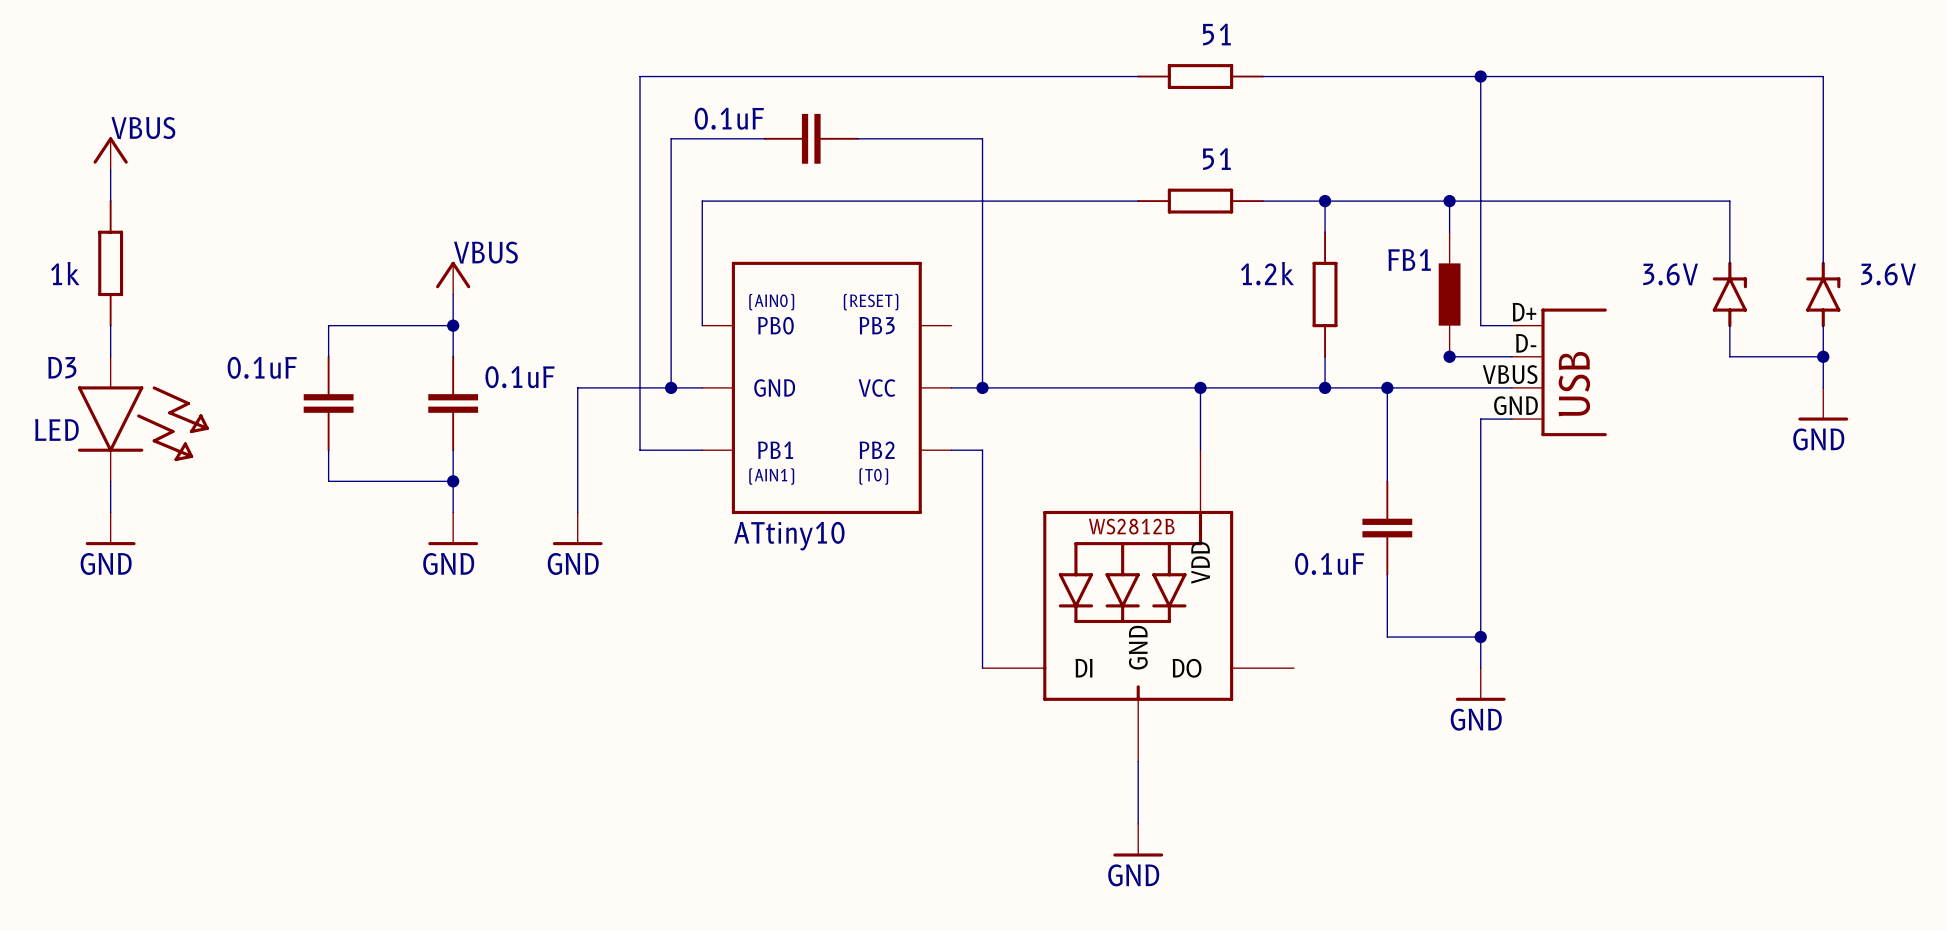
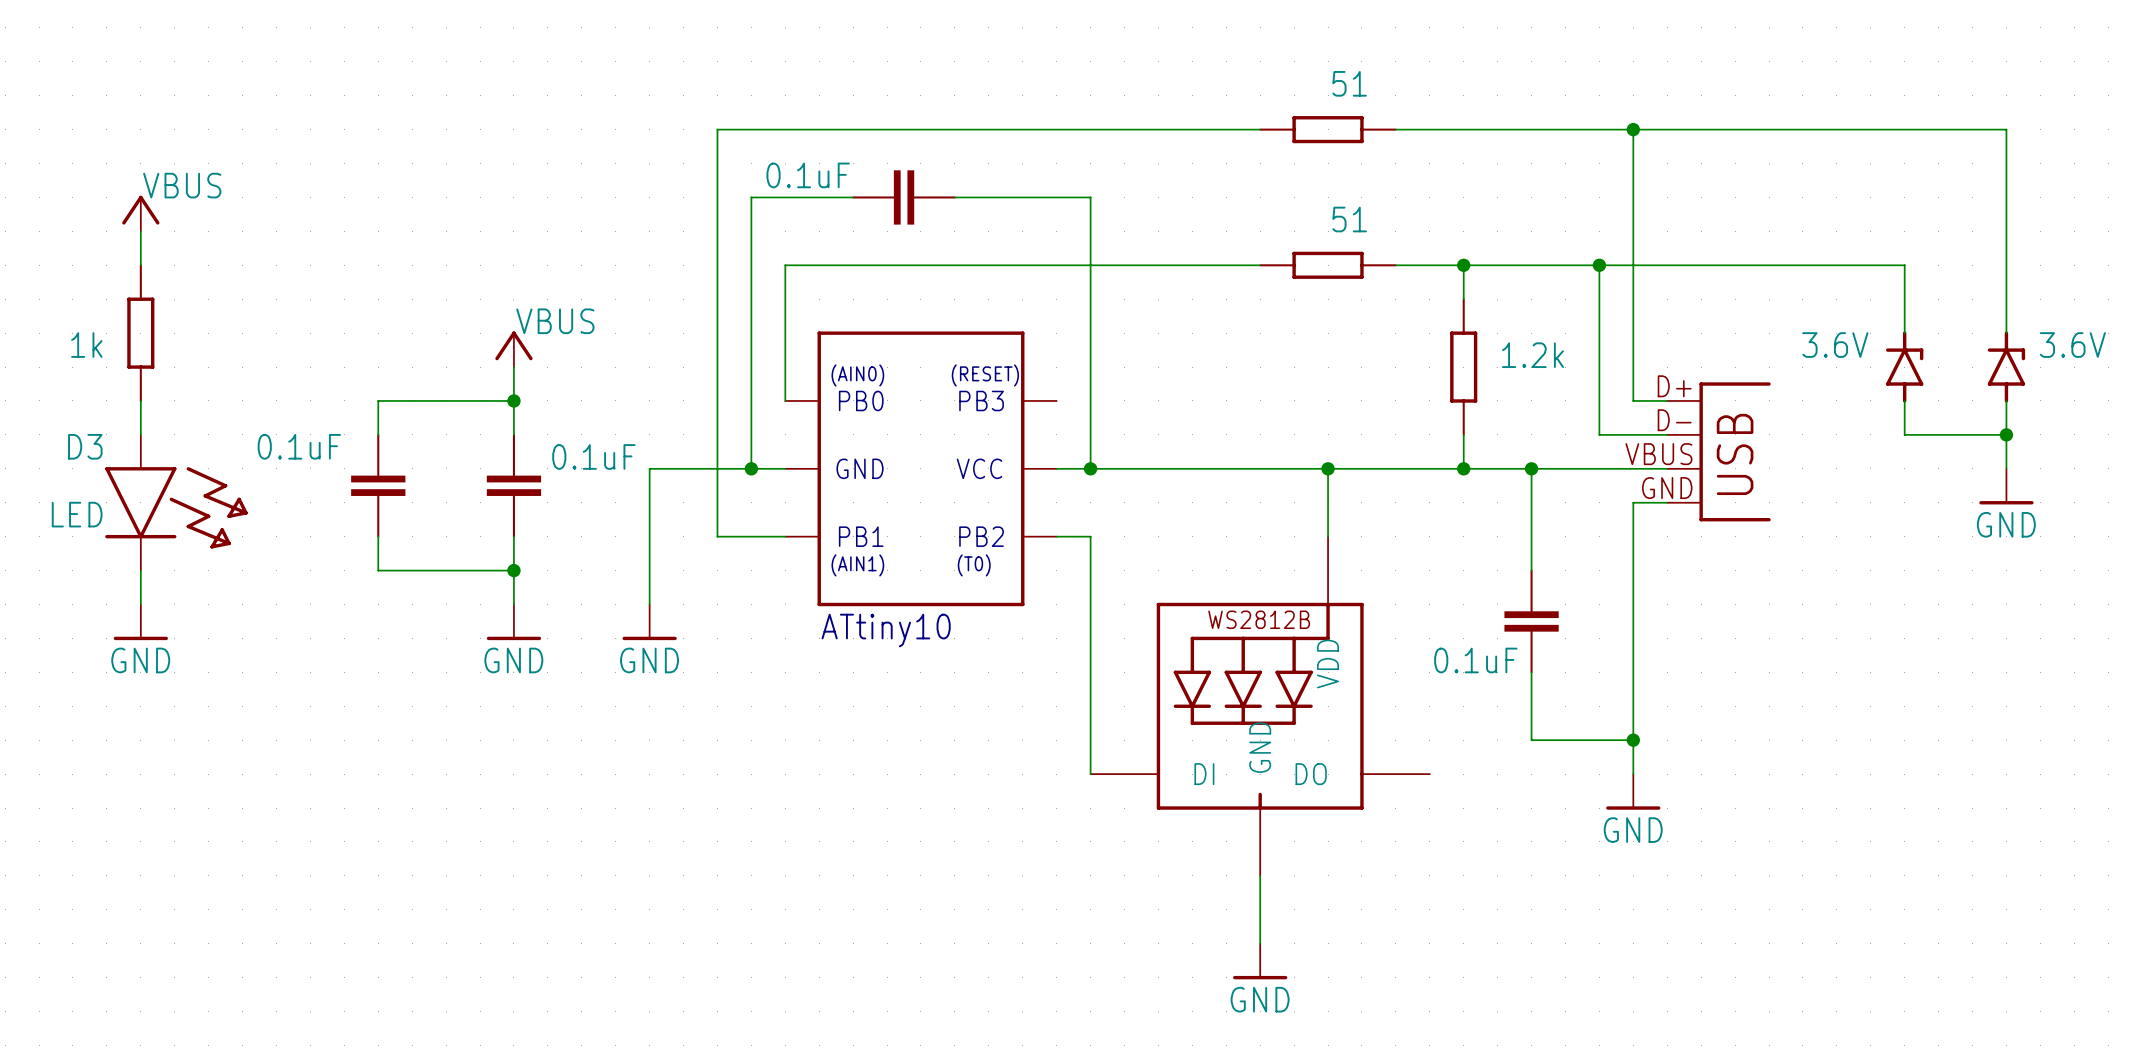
part text position: 1.2k (1267, 273) -> 1.2k (1532, 355)
FB1: (1449, 294) -> none
junction: (1449, 356) -> none

